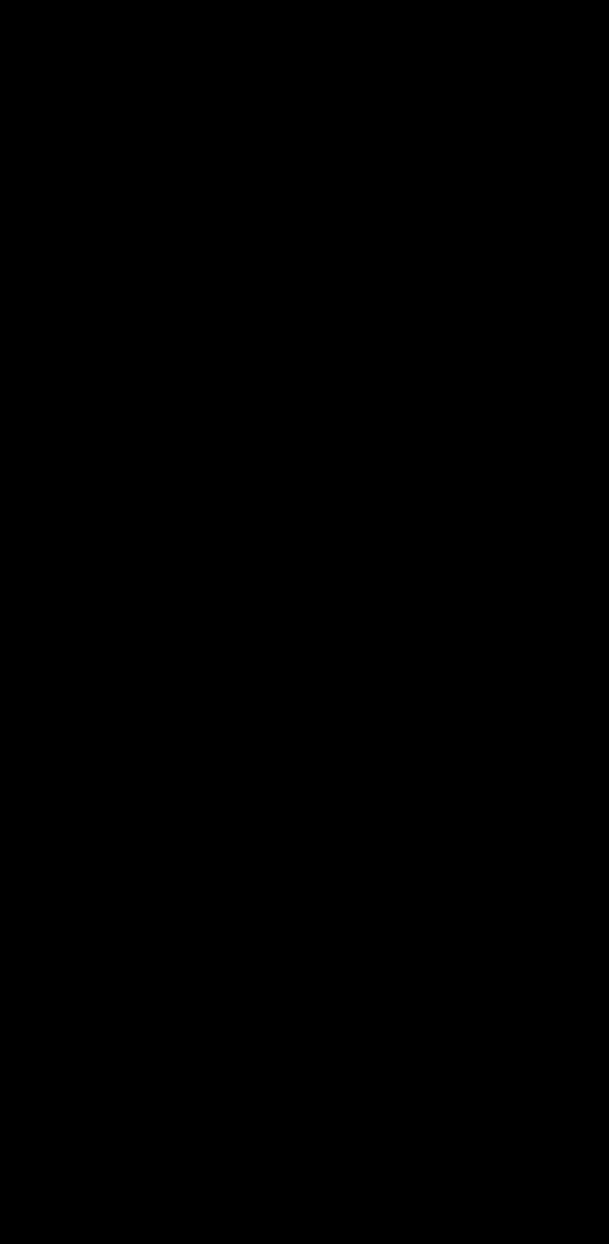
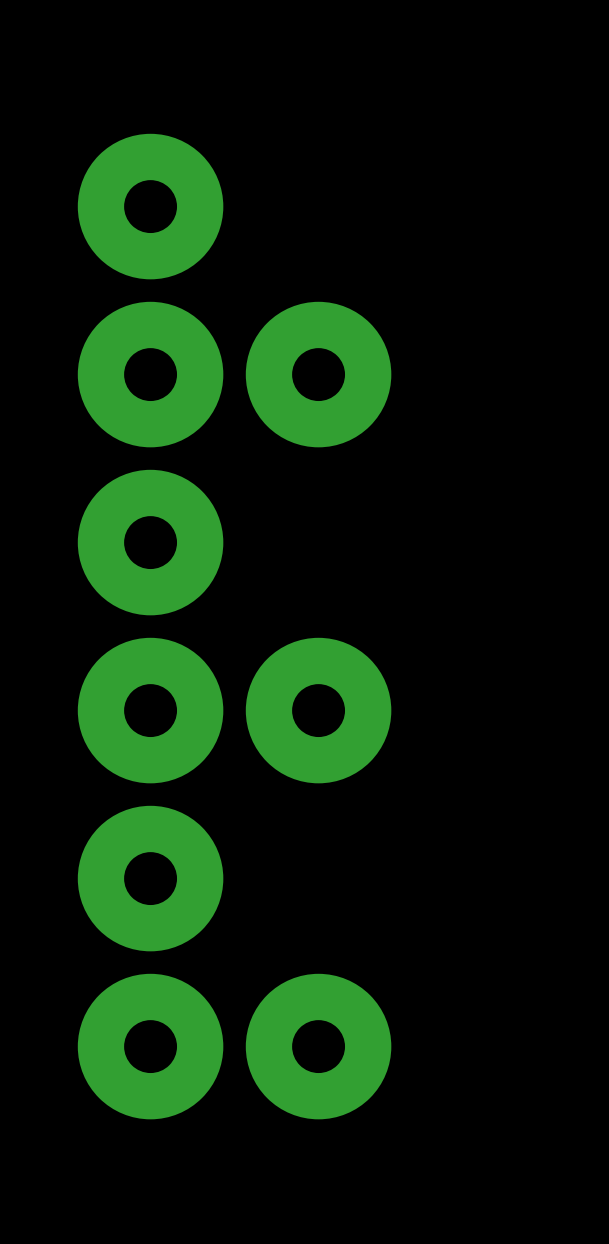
via: none -> (150, 206)
via: none -> (150, 374)
via: none -> (318, 374)
via: none -> (150, 542)
via: none -> (150, 710)
via: none -> (318, 710)
via: none -> (150, 878)
via: none -> (150, 1046)
via: none -> (318, 1046)

